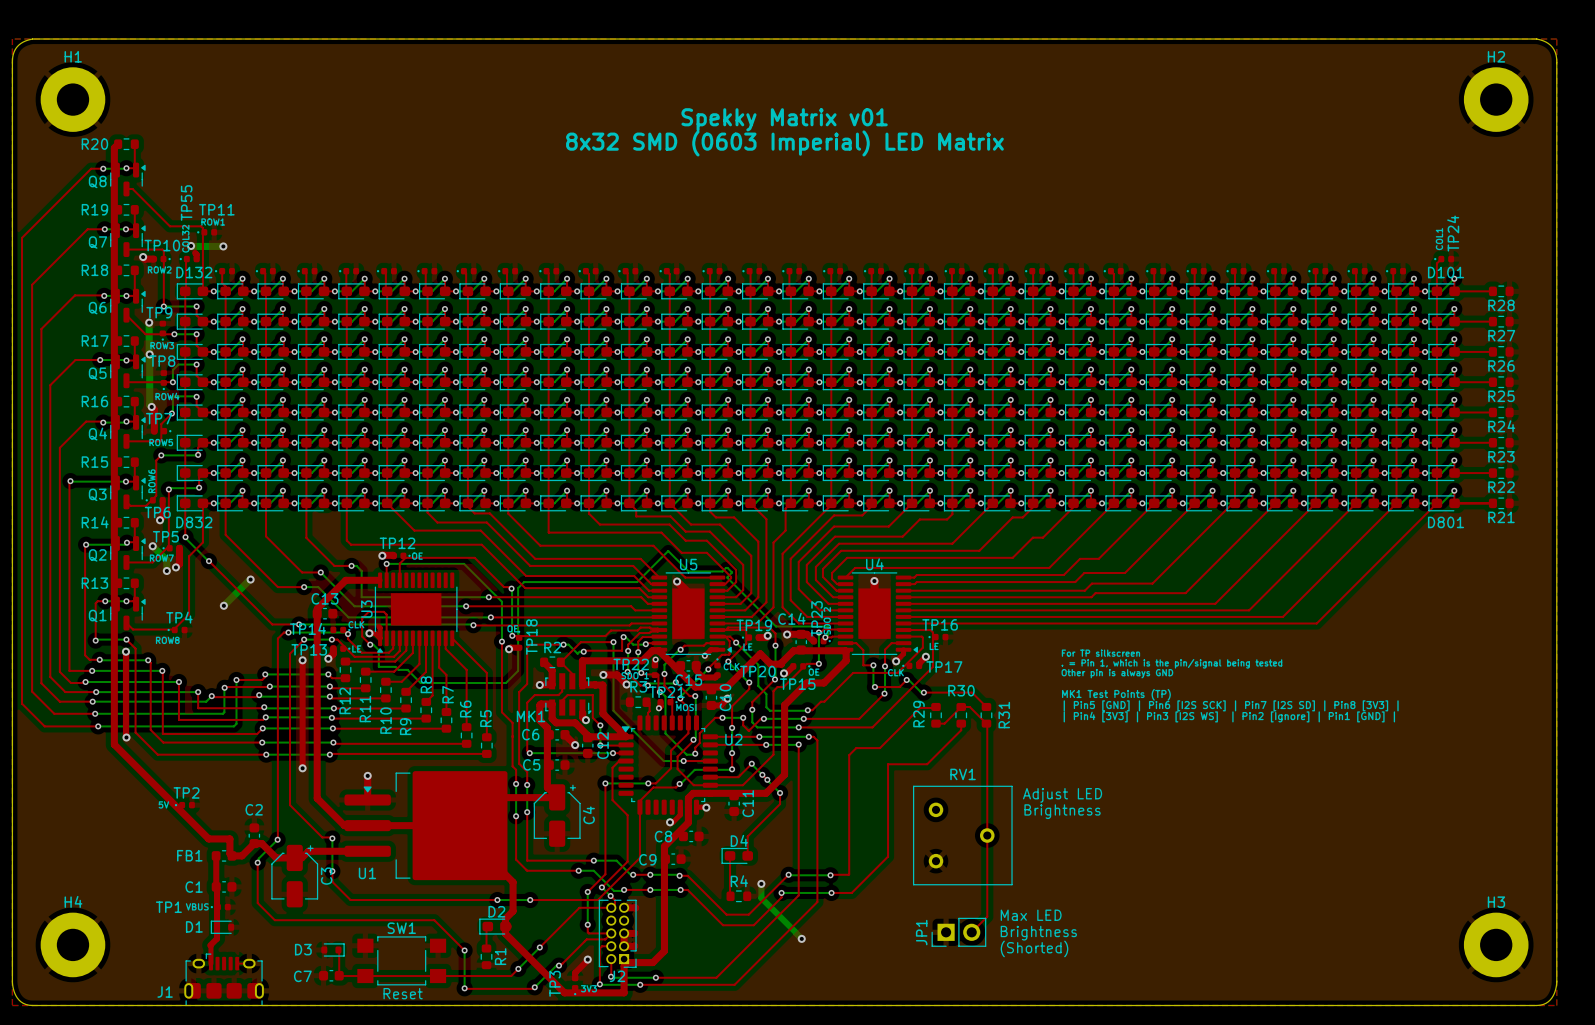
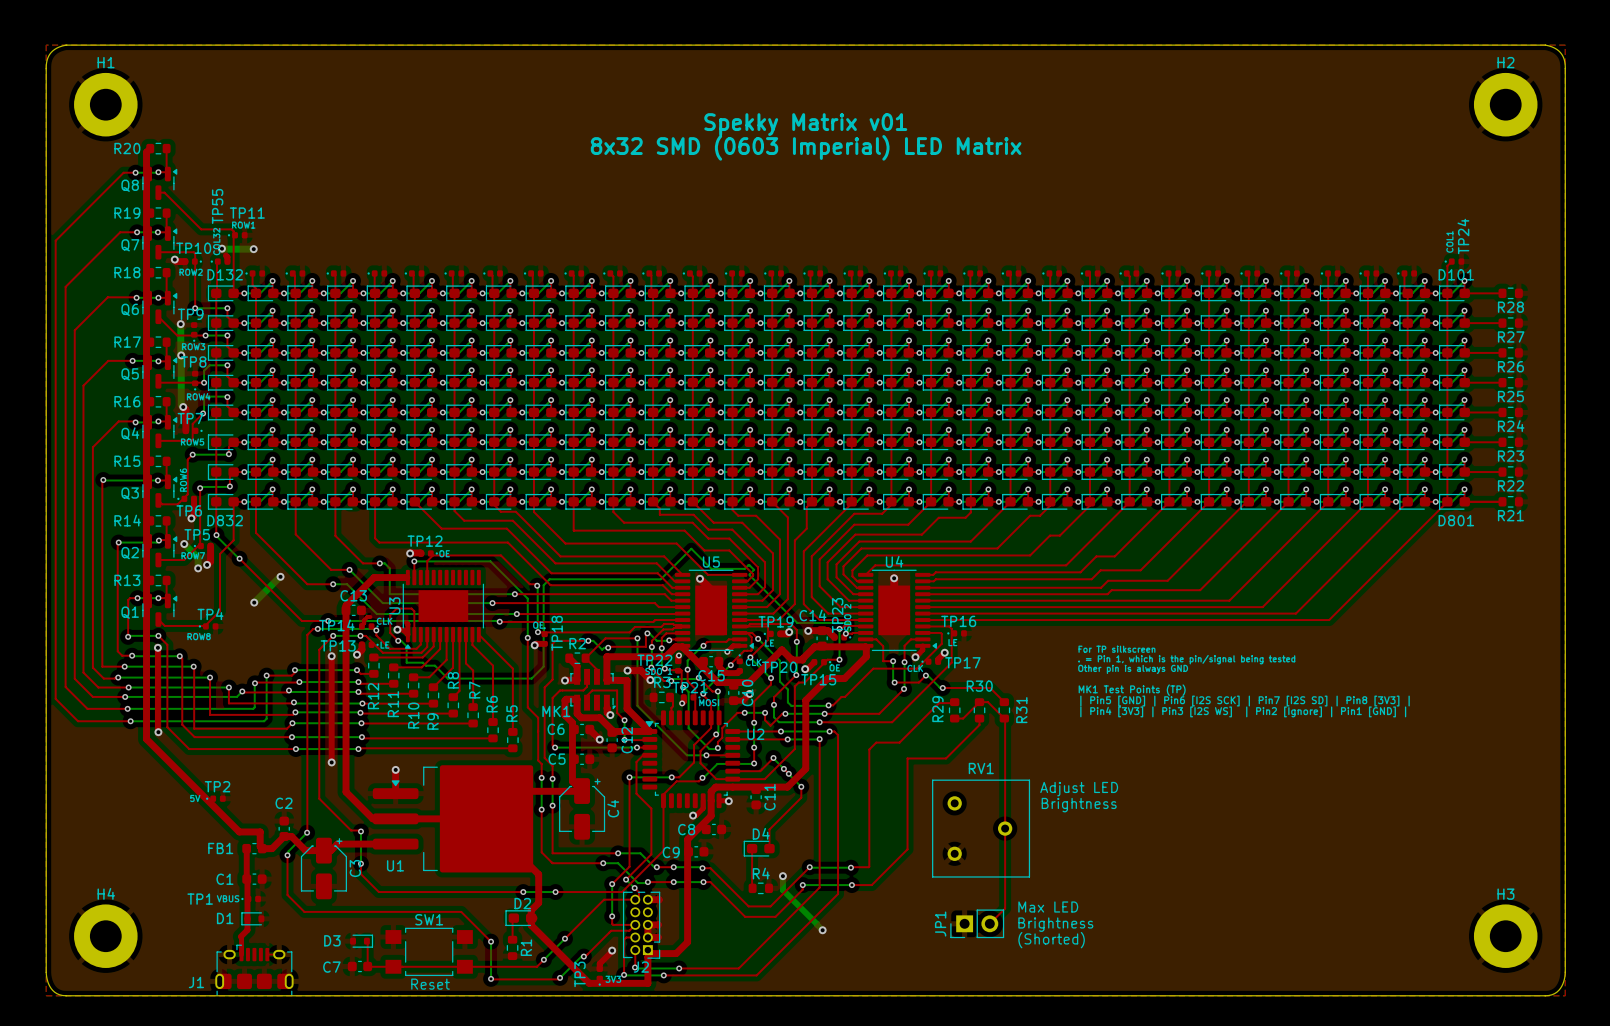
top track: none -> (370, 617) (364, 620) (361, 626)

